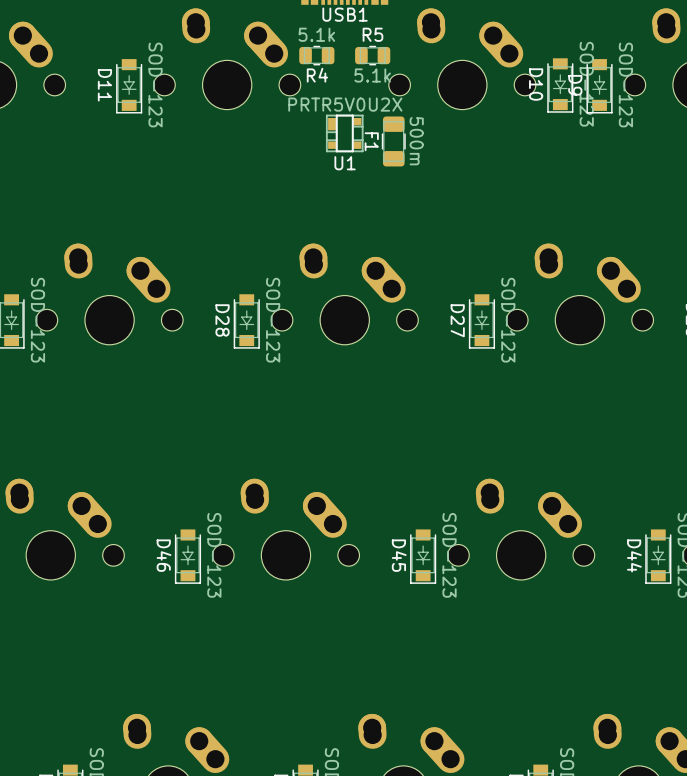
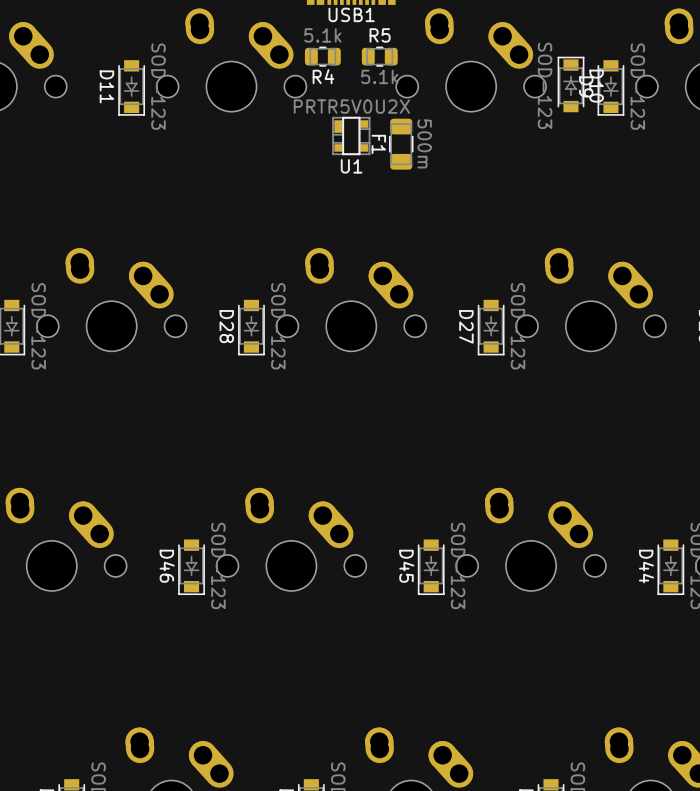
D10 rotation: 0° (560, 85) -> 180° (571, 84)

